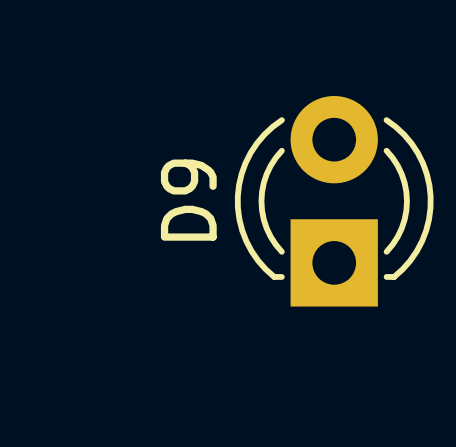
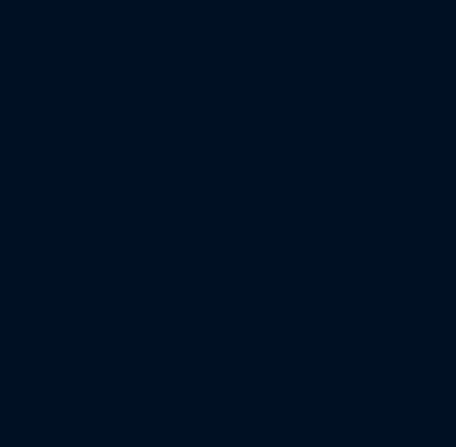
D9: (334, 201) -> none

